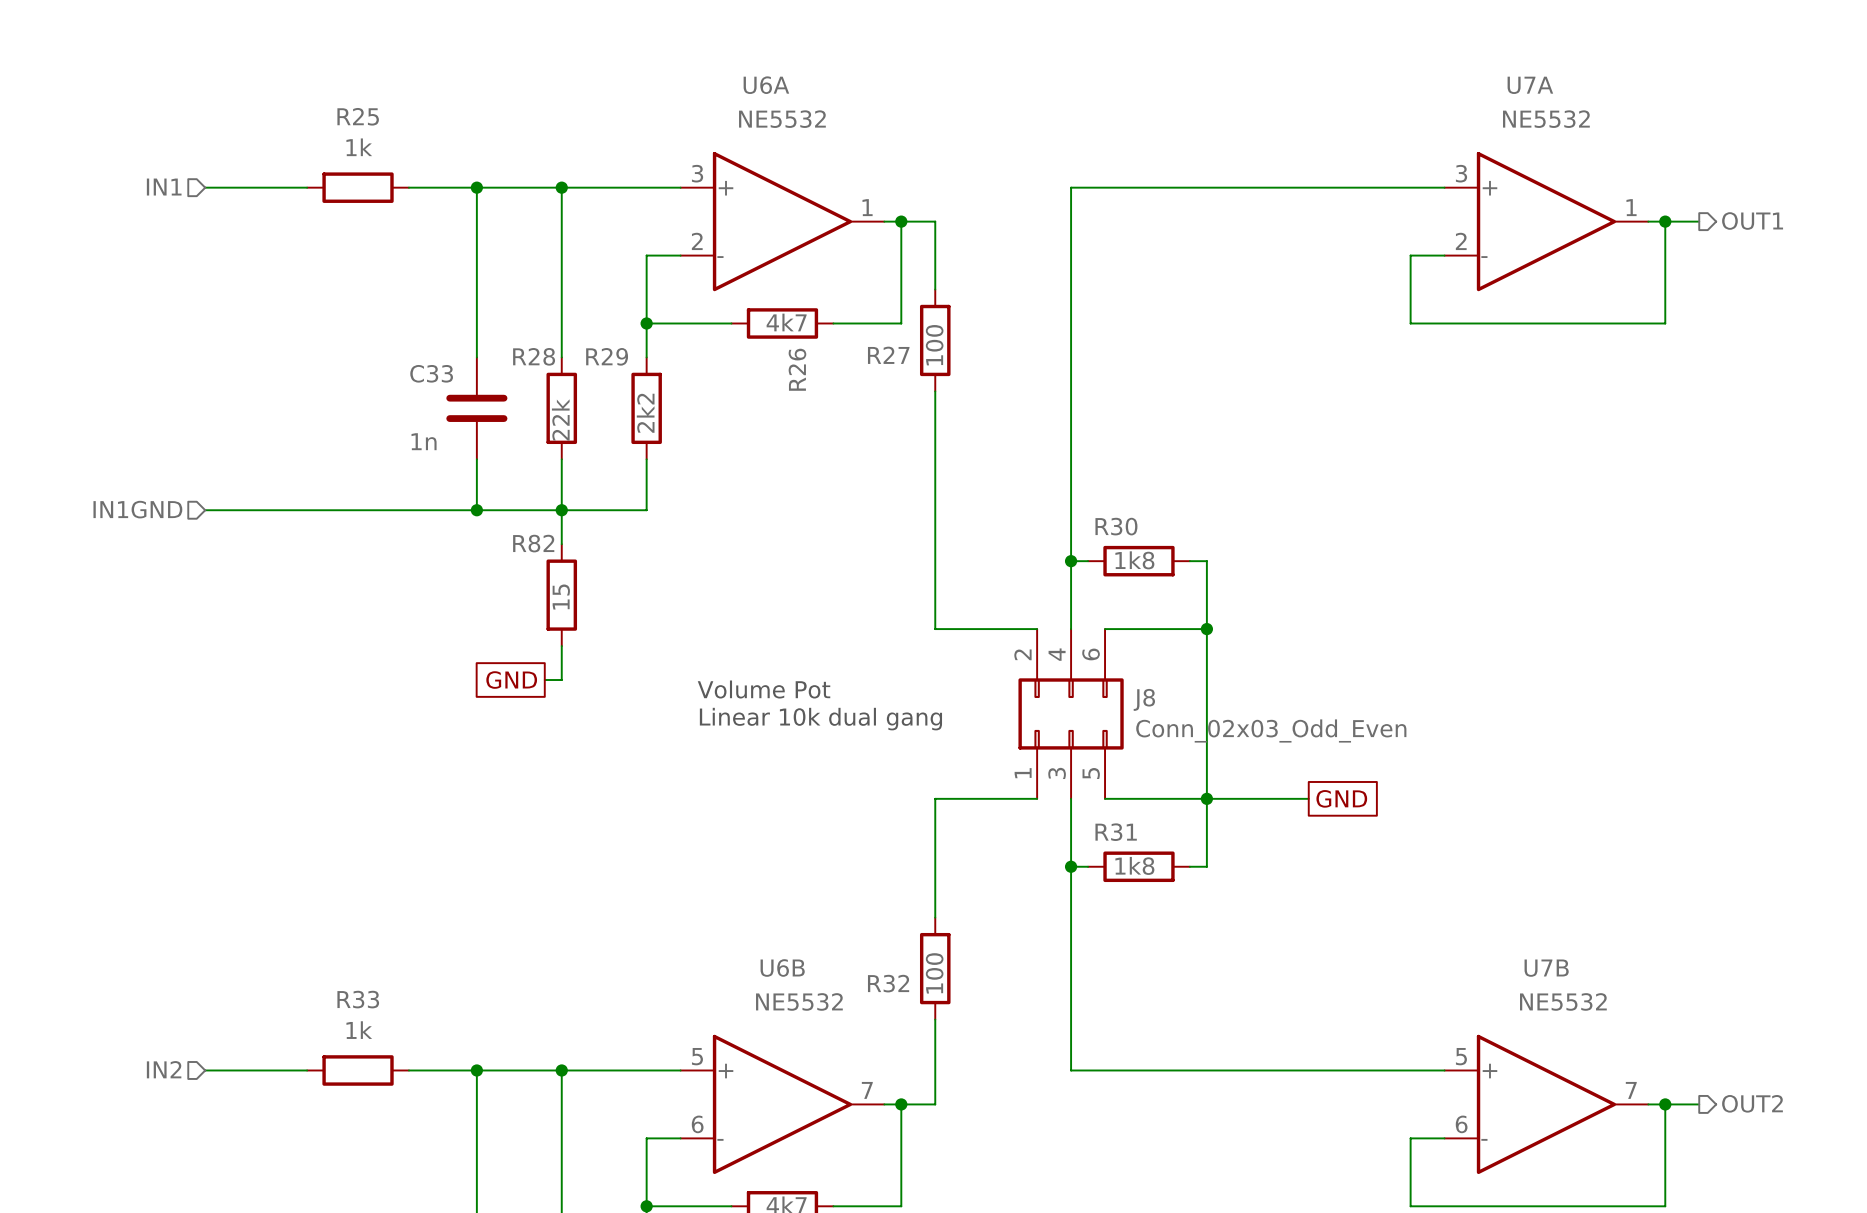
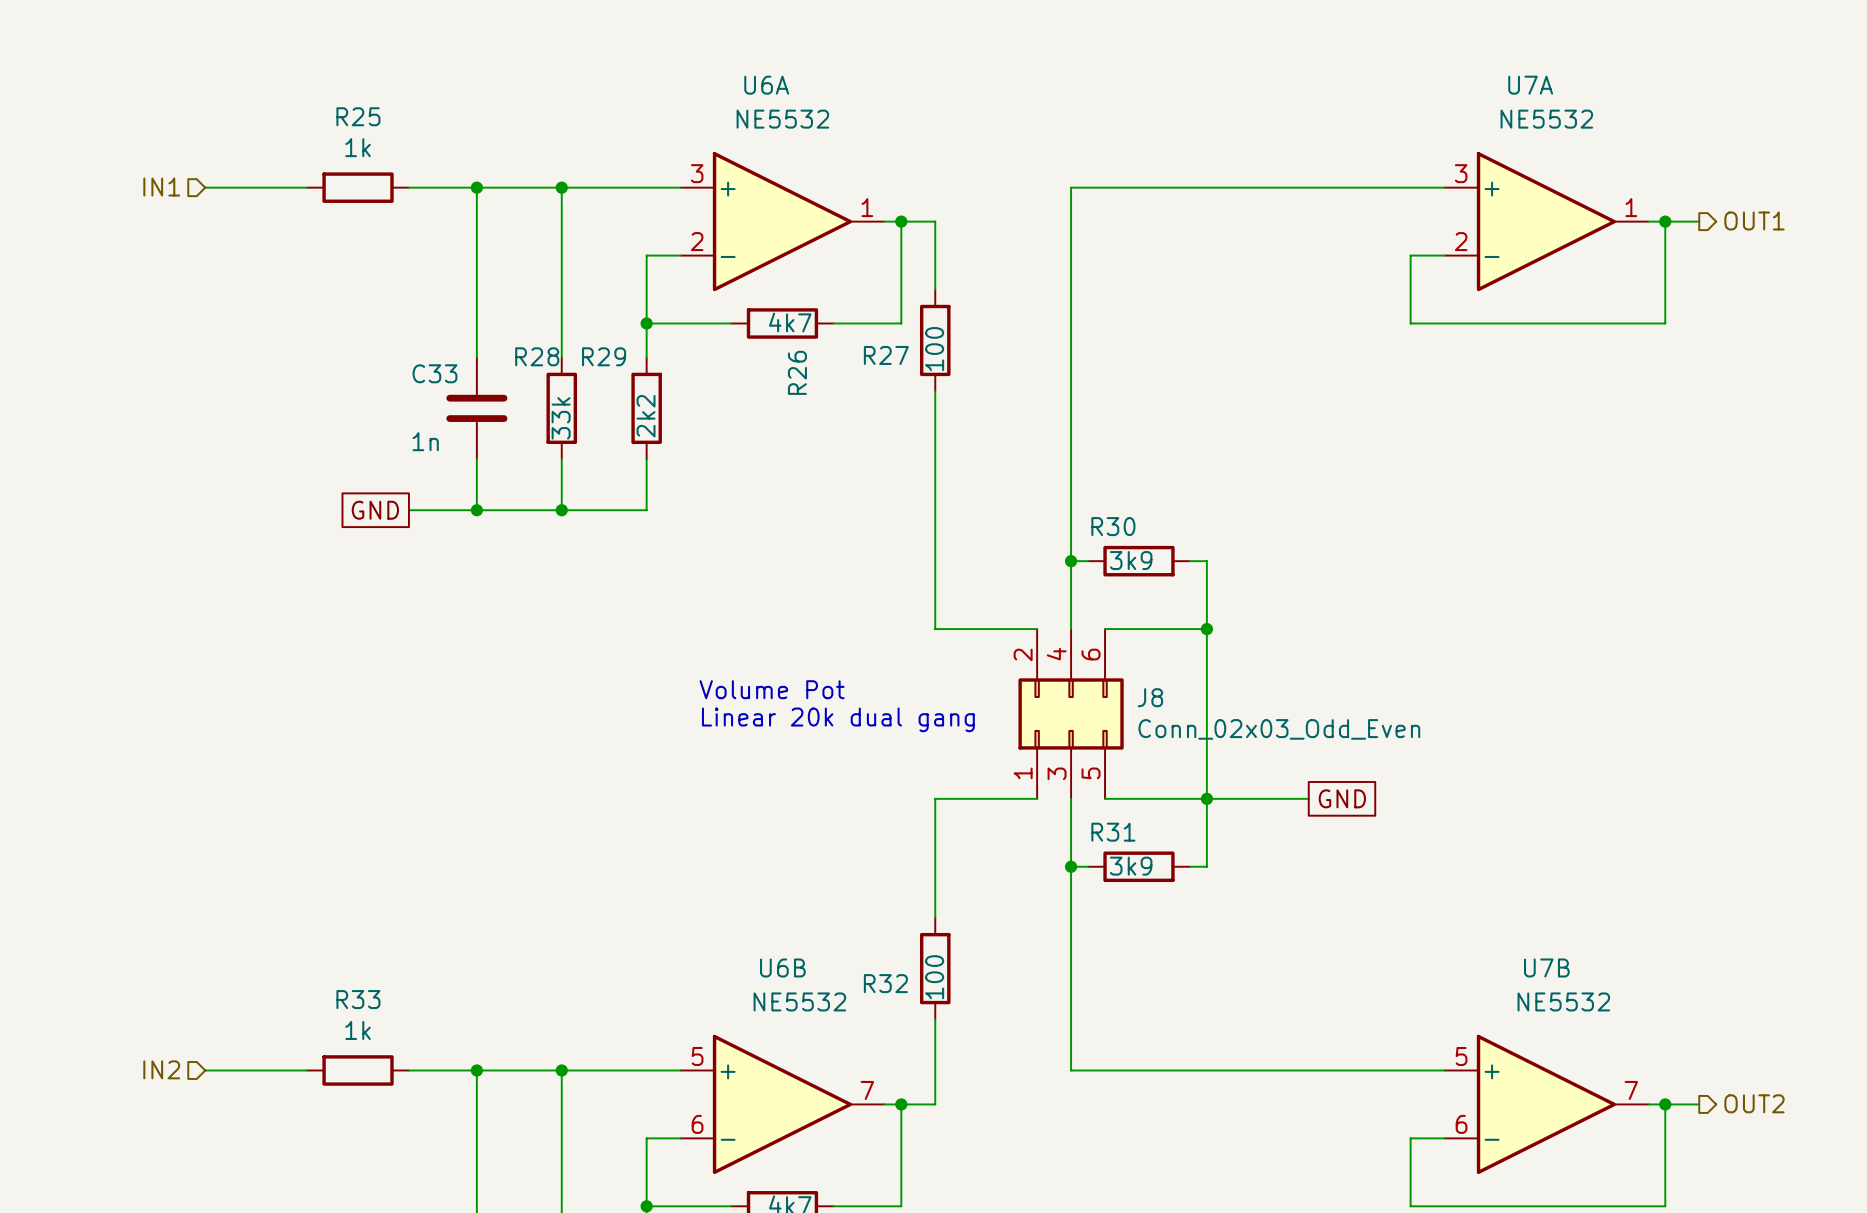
R28 value: 22k (560, 419) -> 33k (561, 418)
hierarchical label: IN1GND (137, 509) -> none
wire: (205, 510) (408, 510) -> none
wire: (561, 510) (561, 544) -> none
R30 value: 1k8 (1134, 560) -> 3k9 (1131, 560)
R82: 15 (561, 595) -> none
wire: (561, 646) (561, 680) (544, 680) -> none
global label position: GND (511, 680) -> GND (375, 510)
text: Linear 10k dual gang (820, 719) -> Linear 20k dual gang (838, 719)
R31 value: 1k8 (1134, 865) -> 3k9 (1131, 866)

